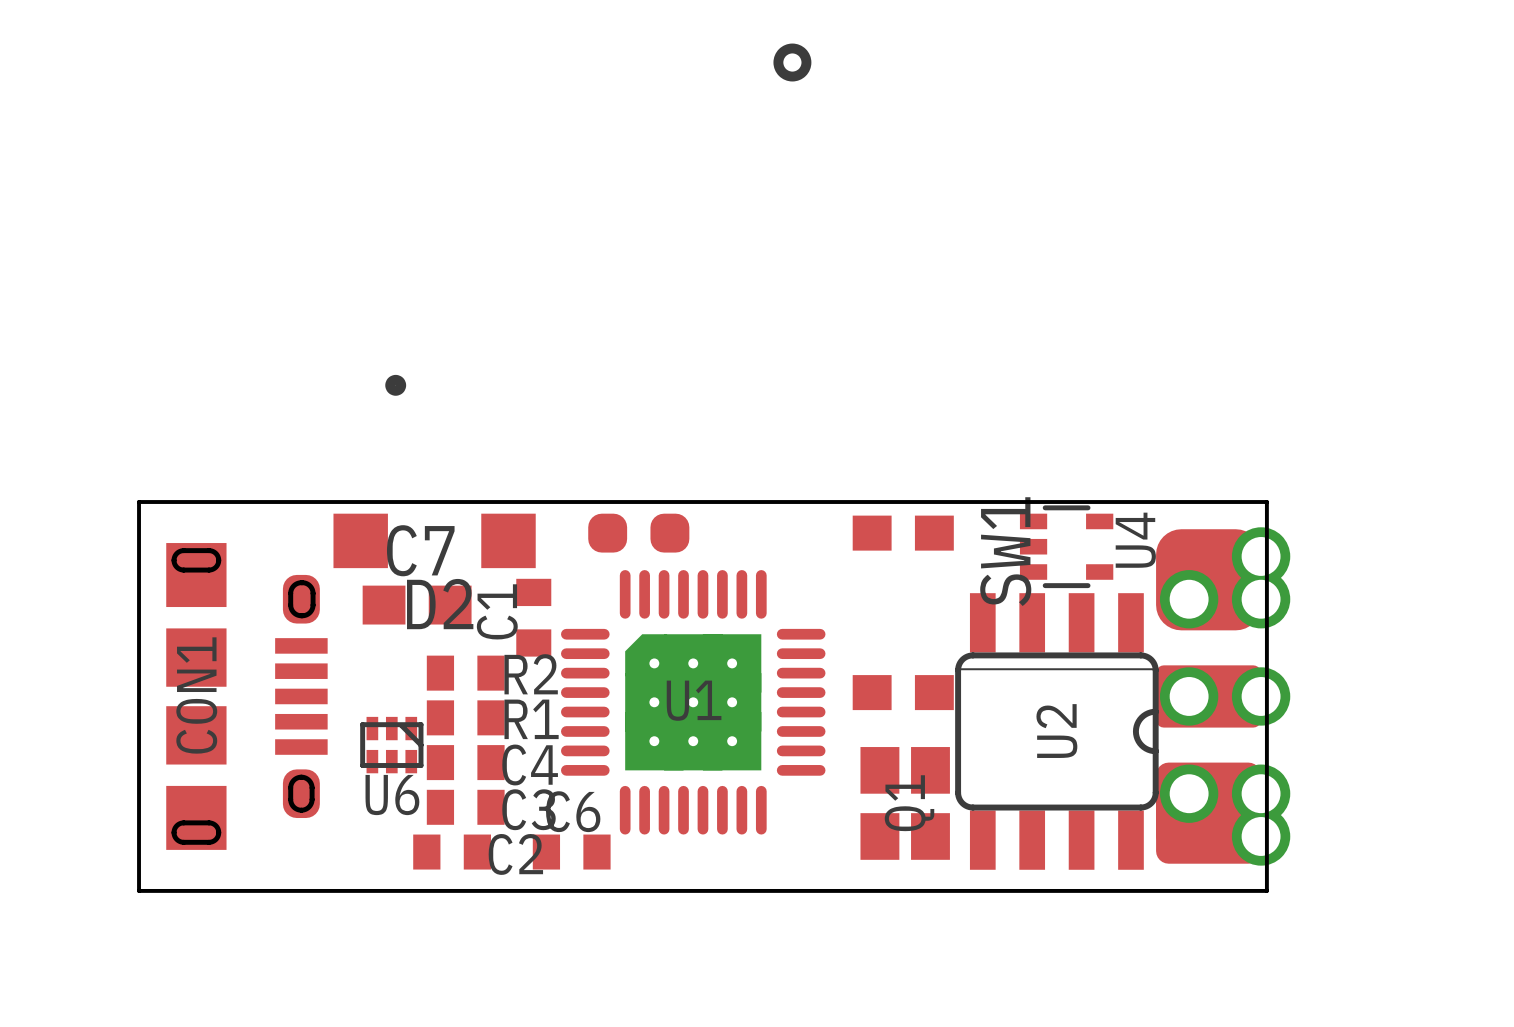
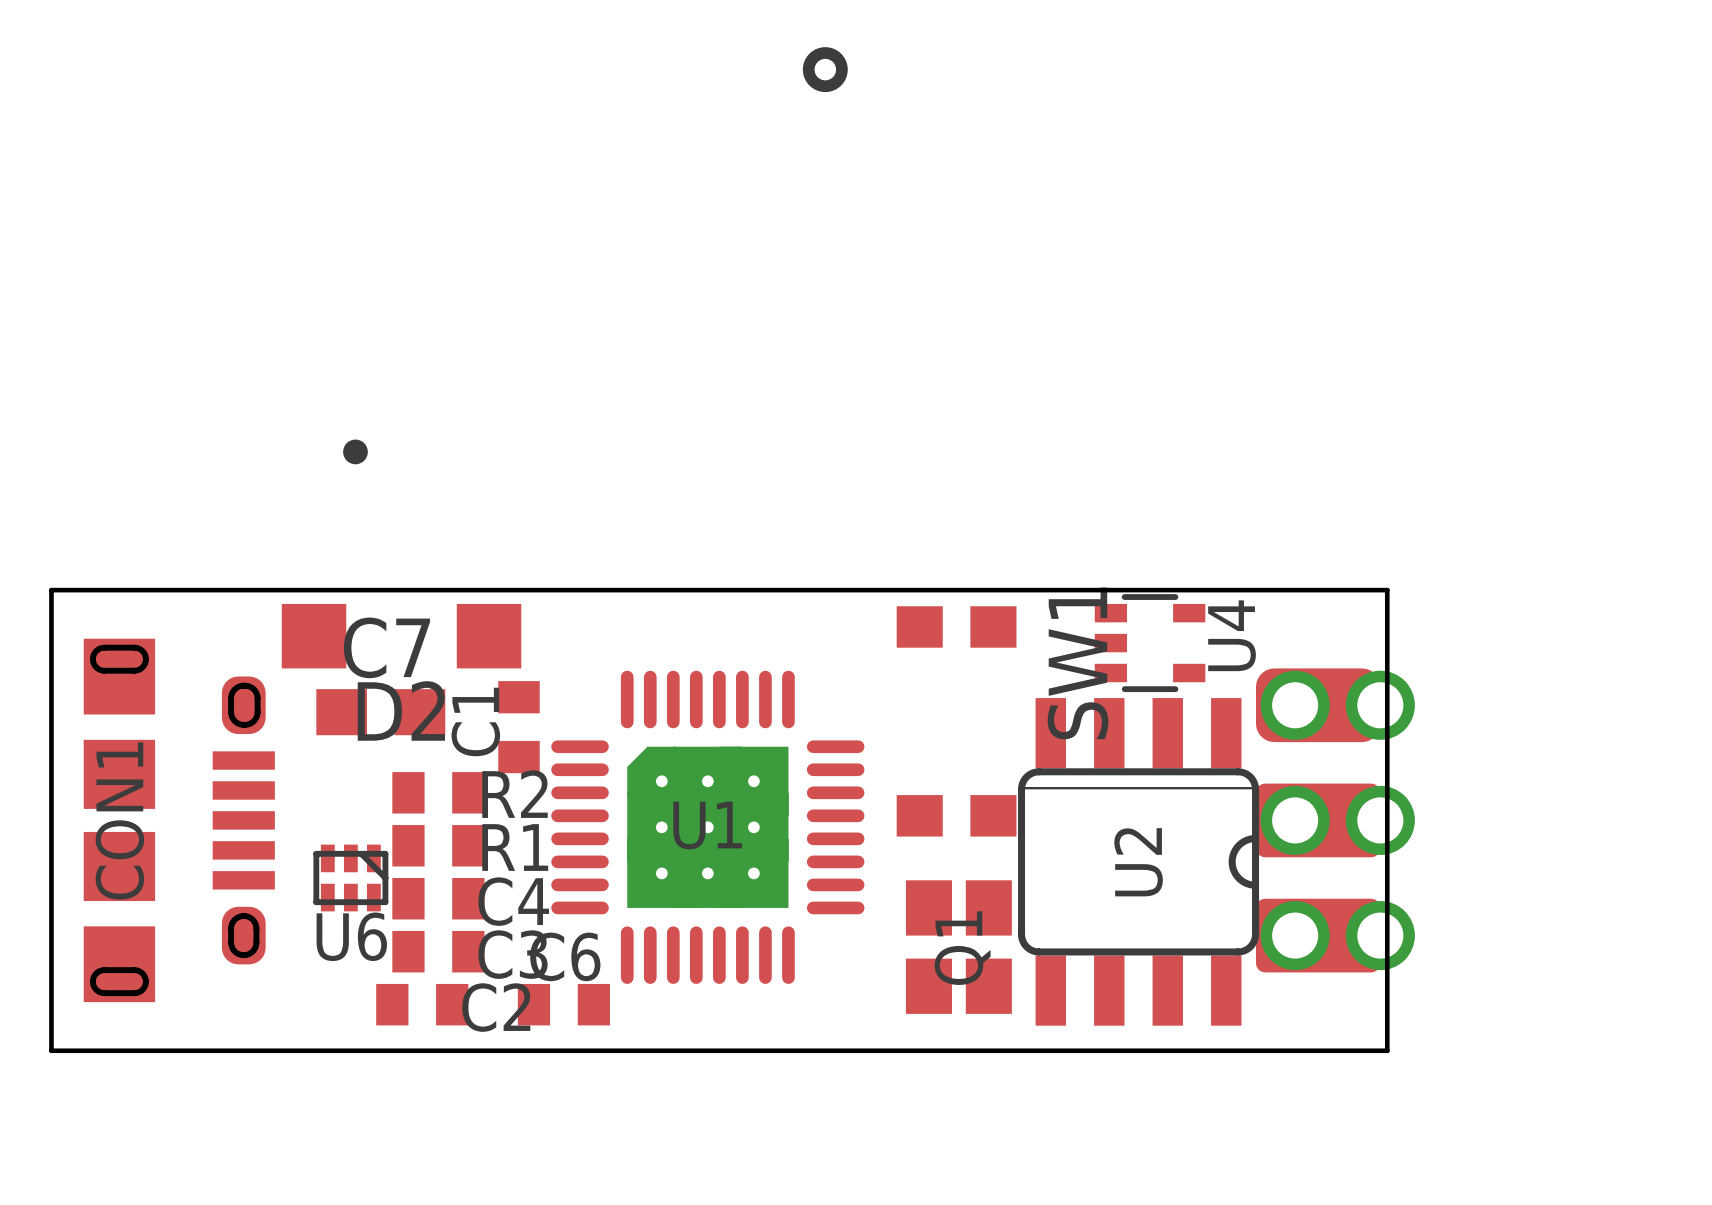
part footprint: [1156, 527, 1291, 866] -> [1255, 668, 1415, 973]
part: (607, 533) -> none
part: (669, 533) -> none

